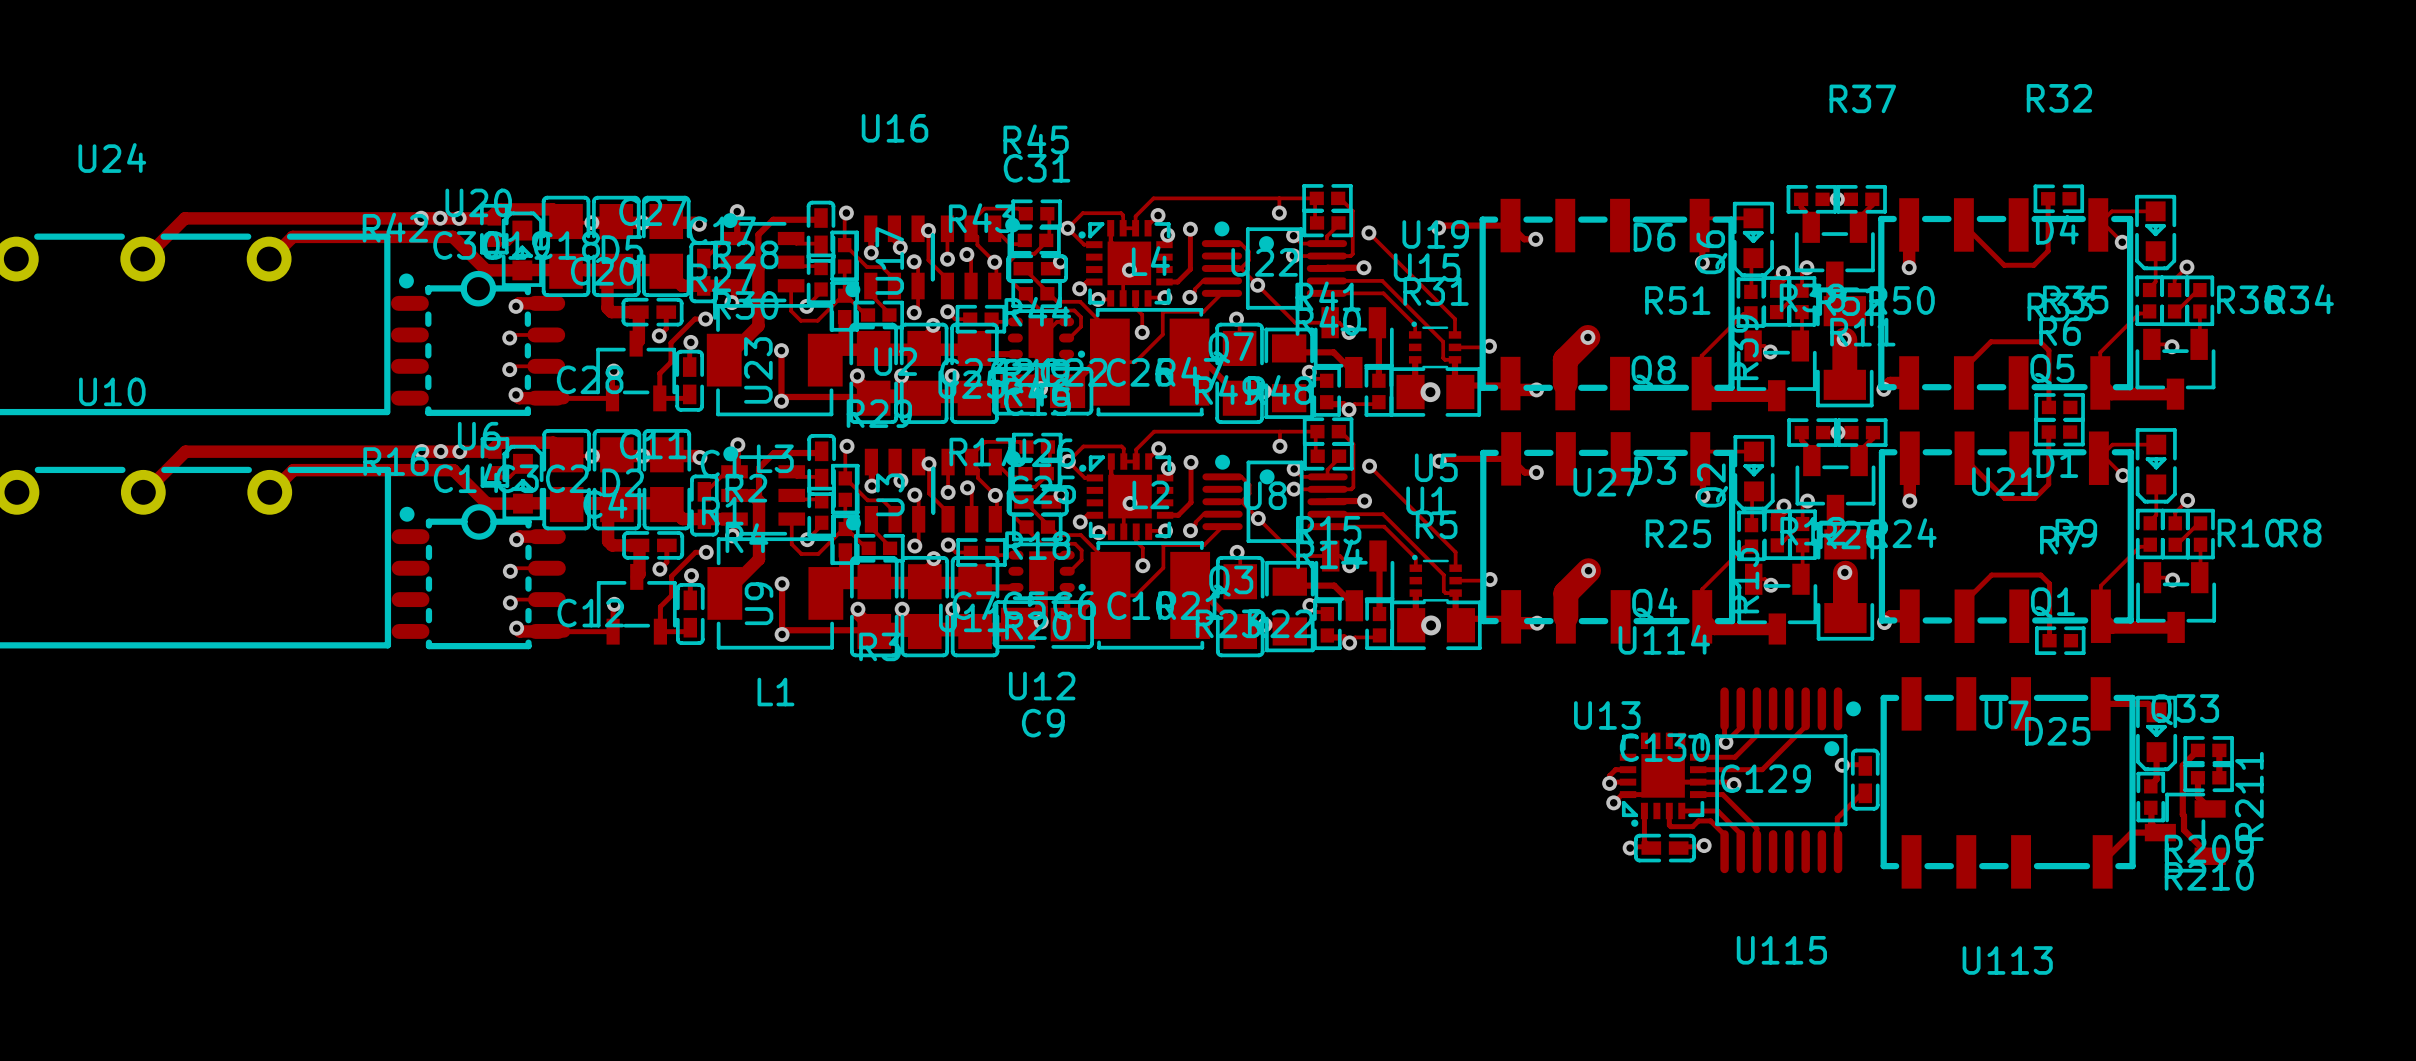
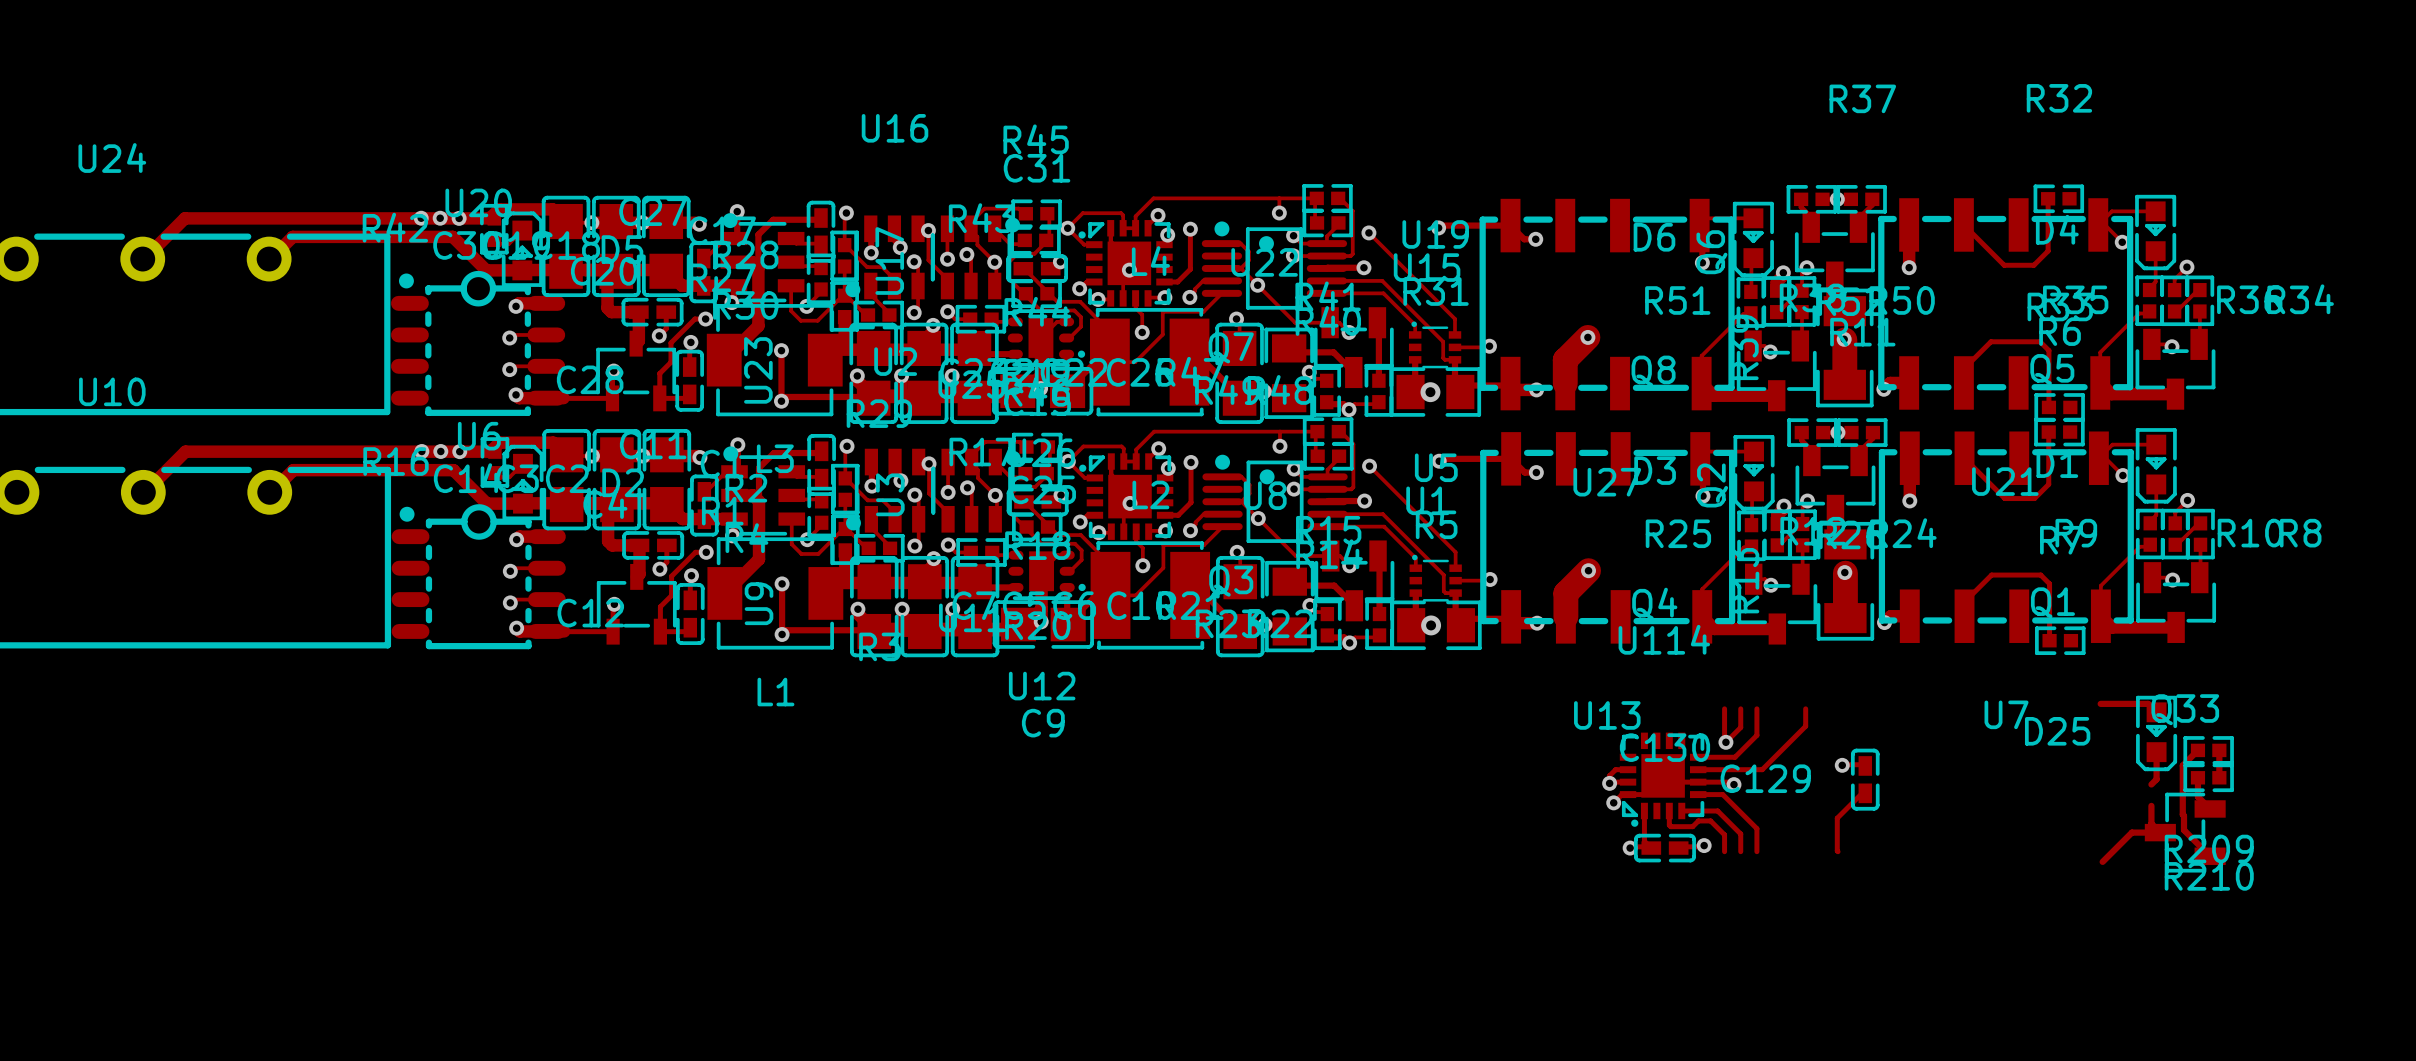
U115: (1788, 780) -> none
U113: (2008, 782) -> none
R211: (2150, 797) -> none

